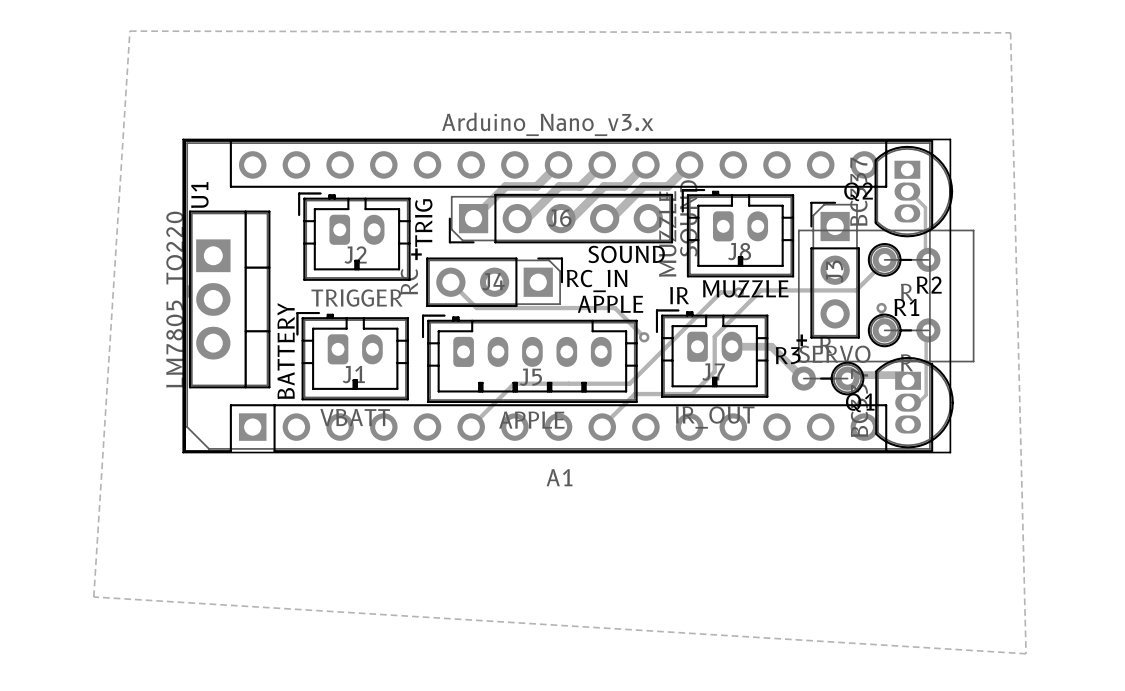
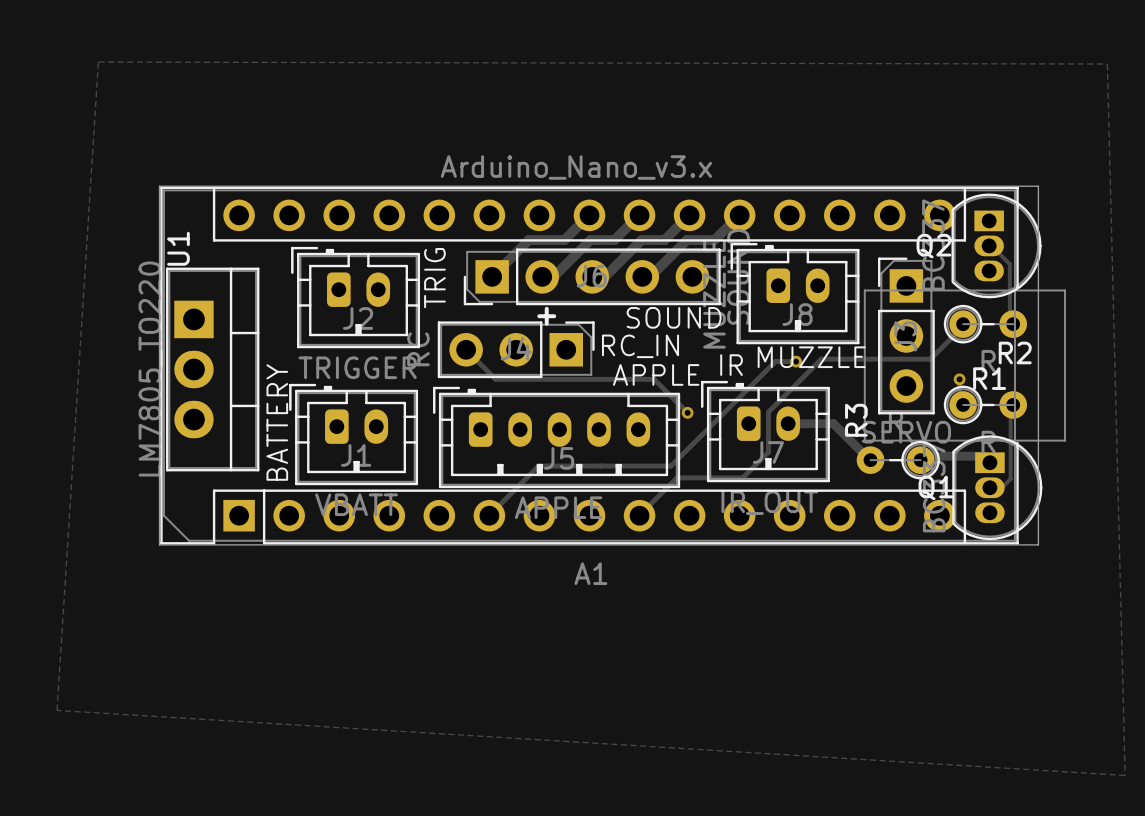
text position: + (416, 254) -> + (546, 316)
text: + (801, 340) -> none
R3 name rotation: 0° (788, 355) -> 90° counterclockwise (856, 420)

